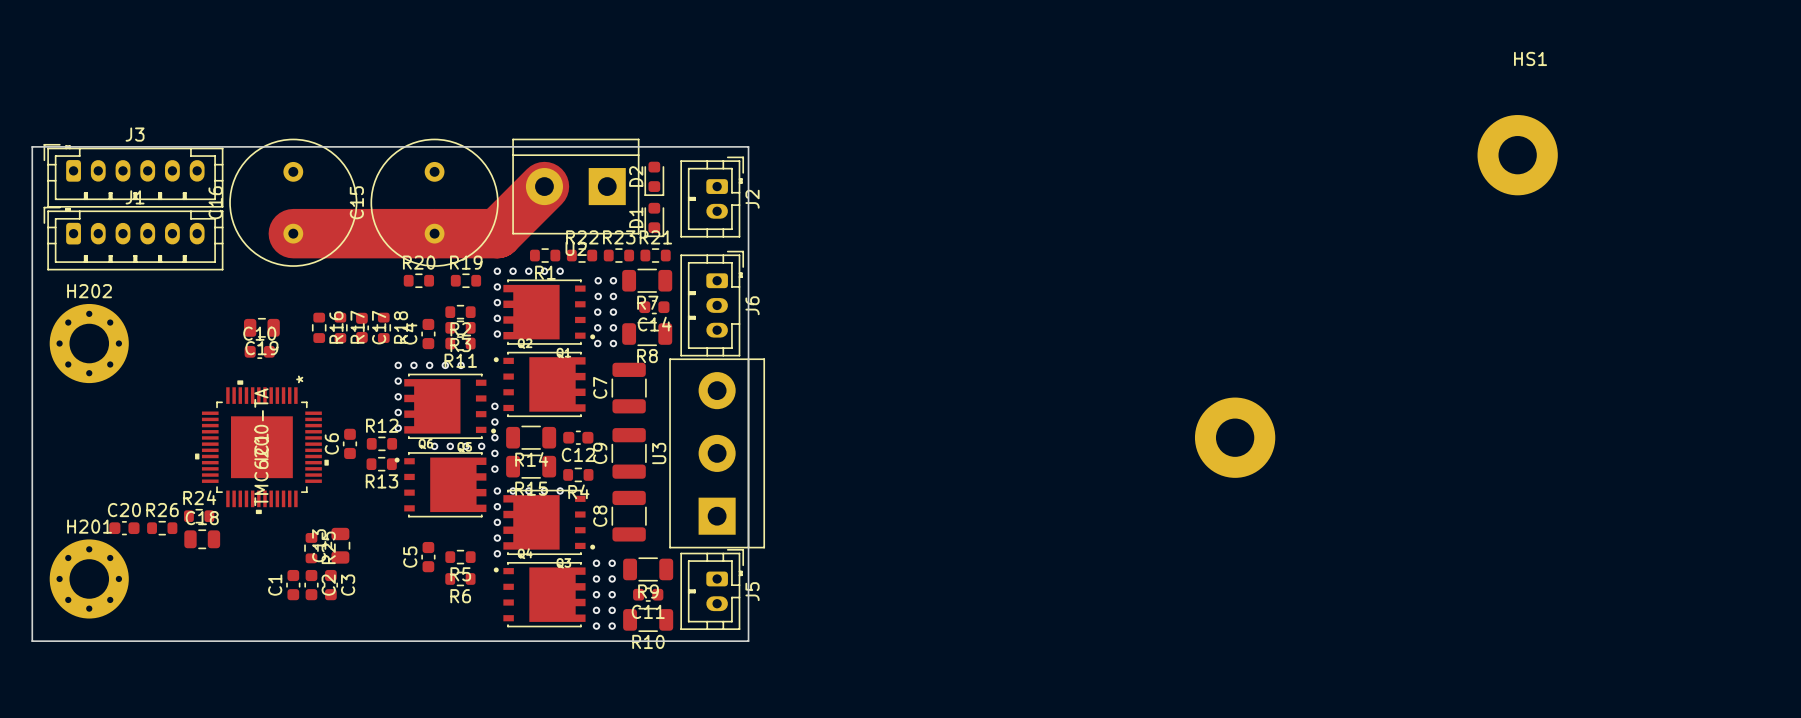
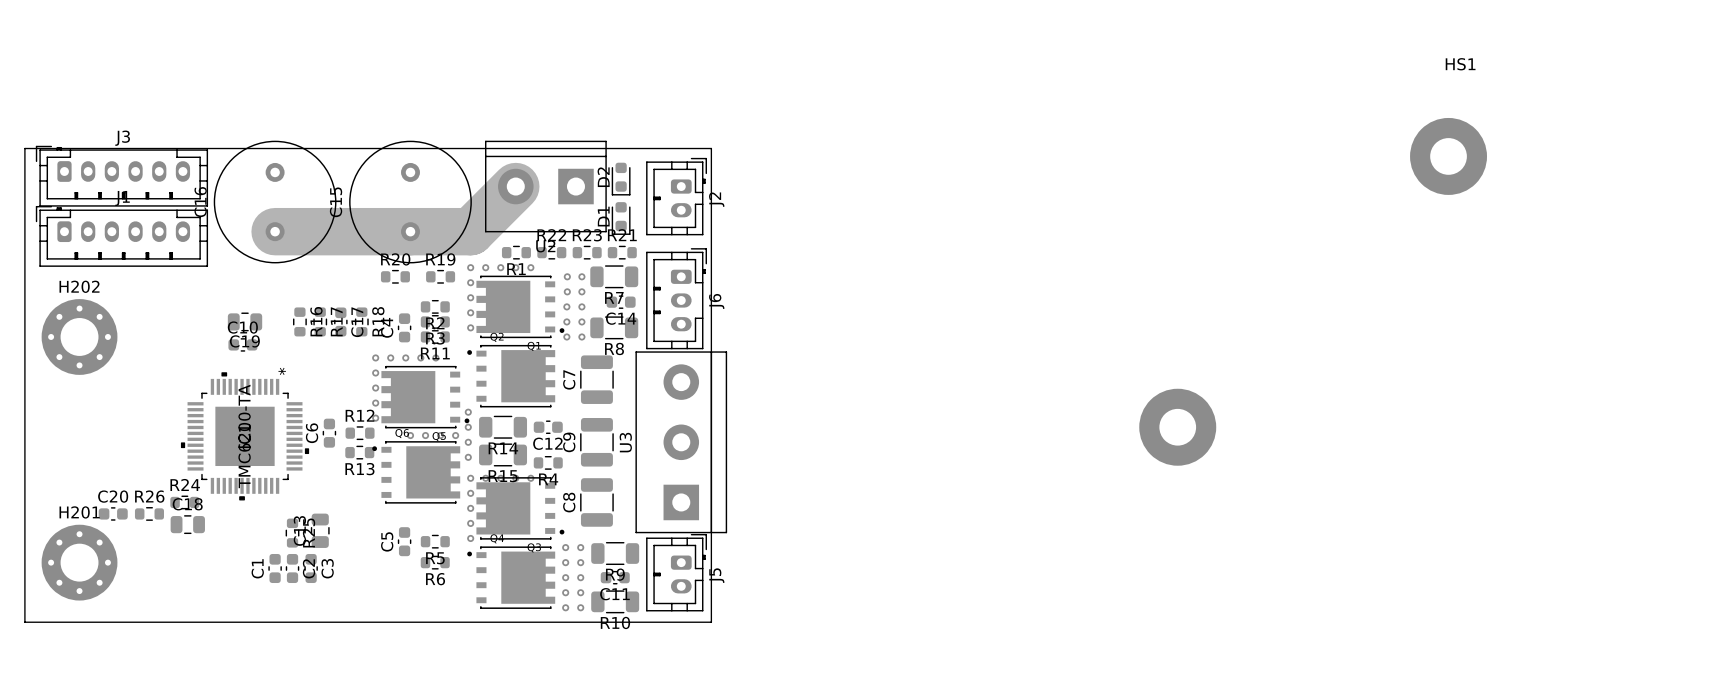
via: (494, 406) -> none

